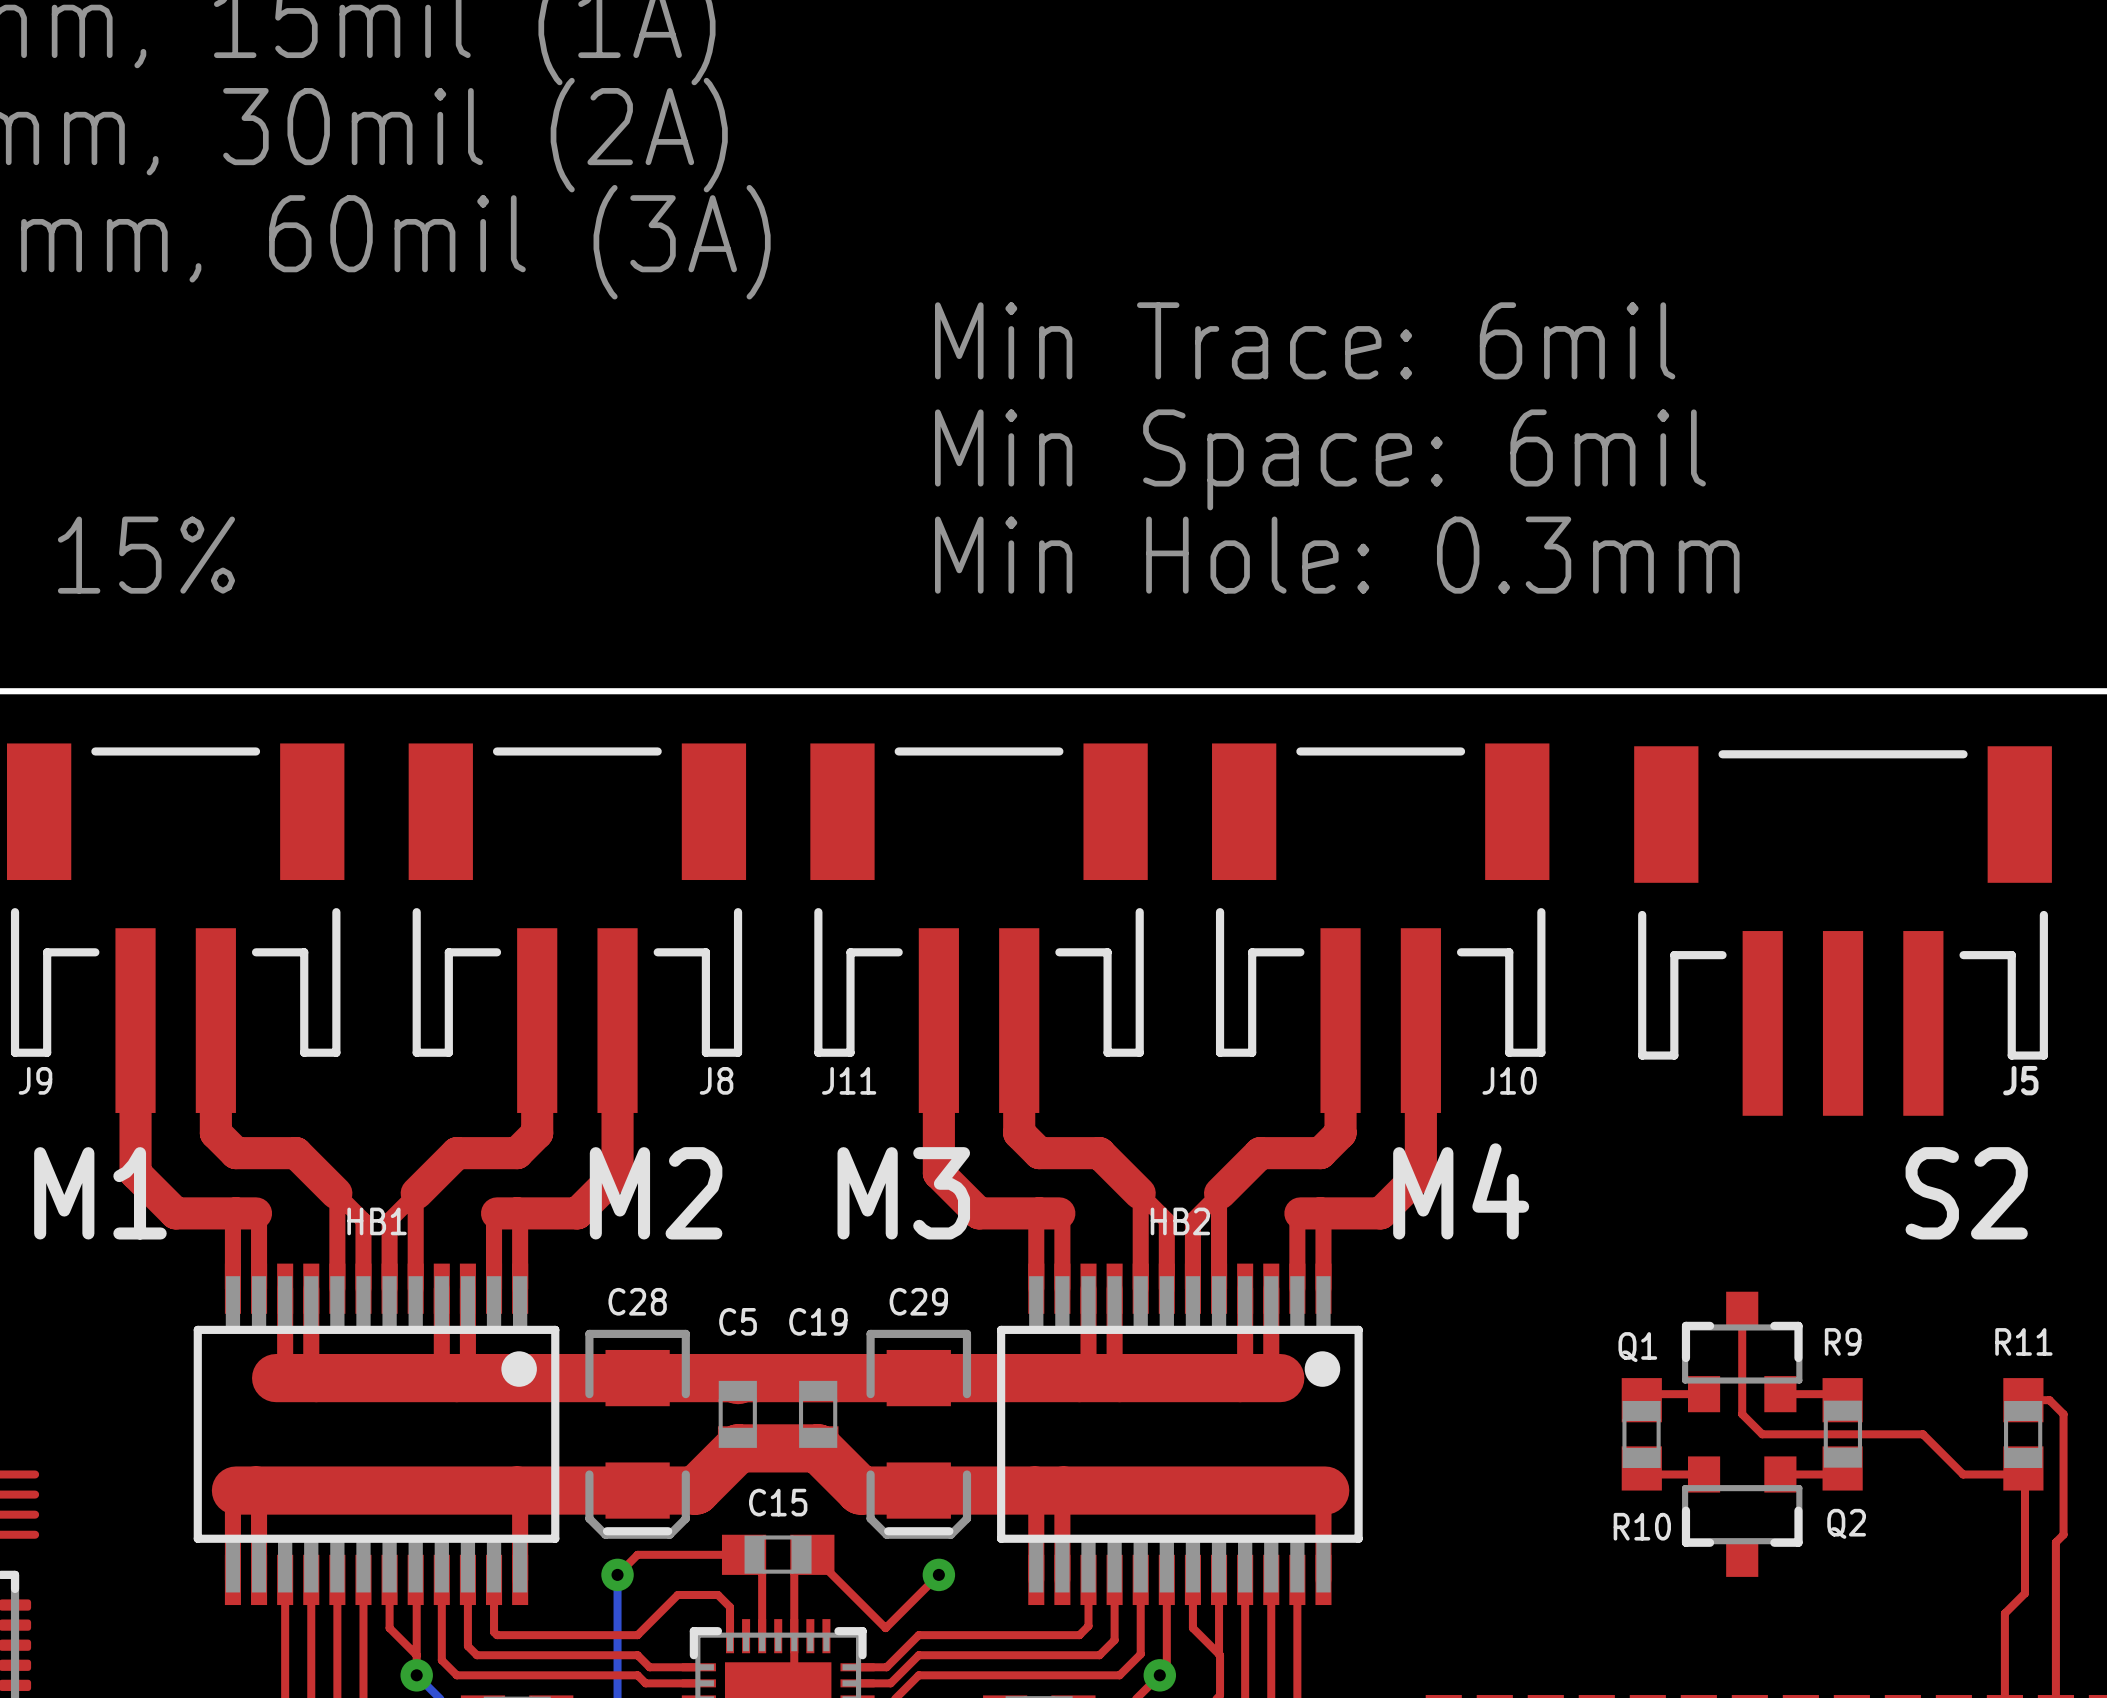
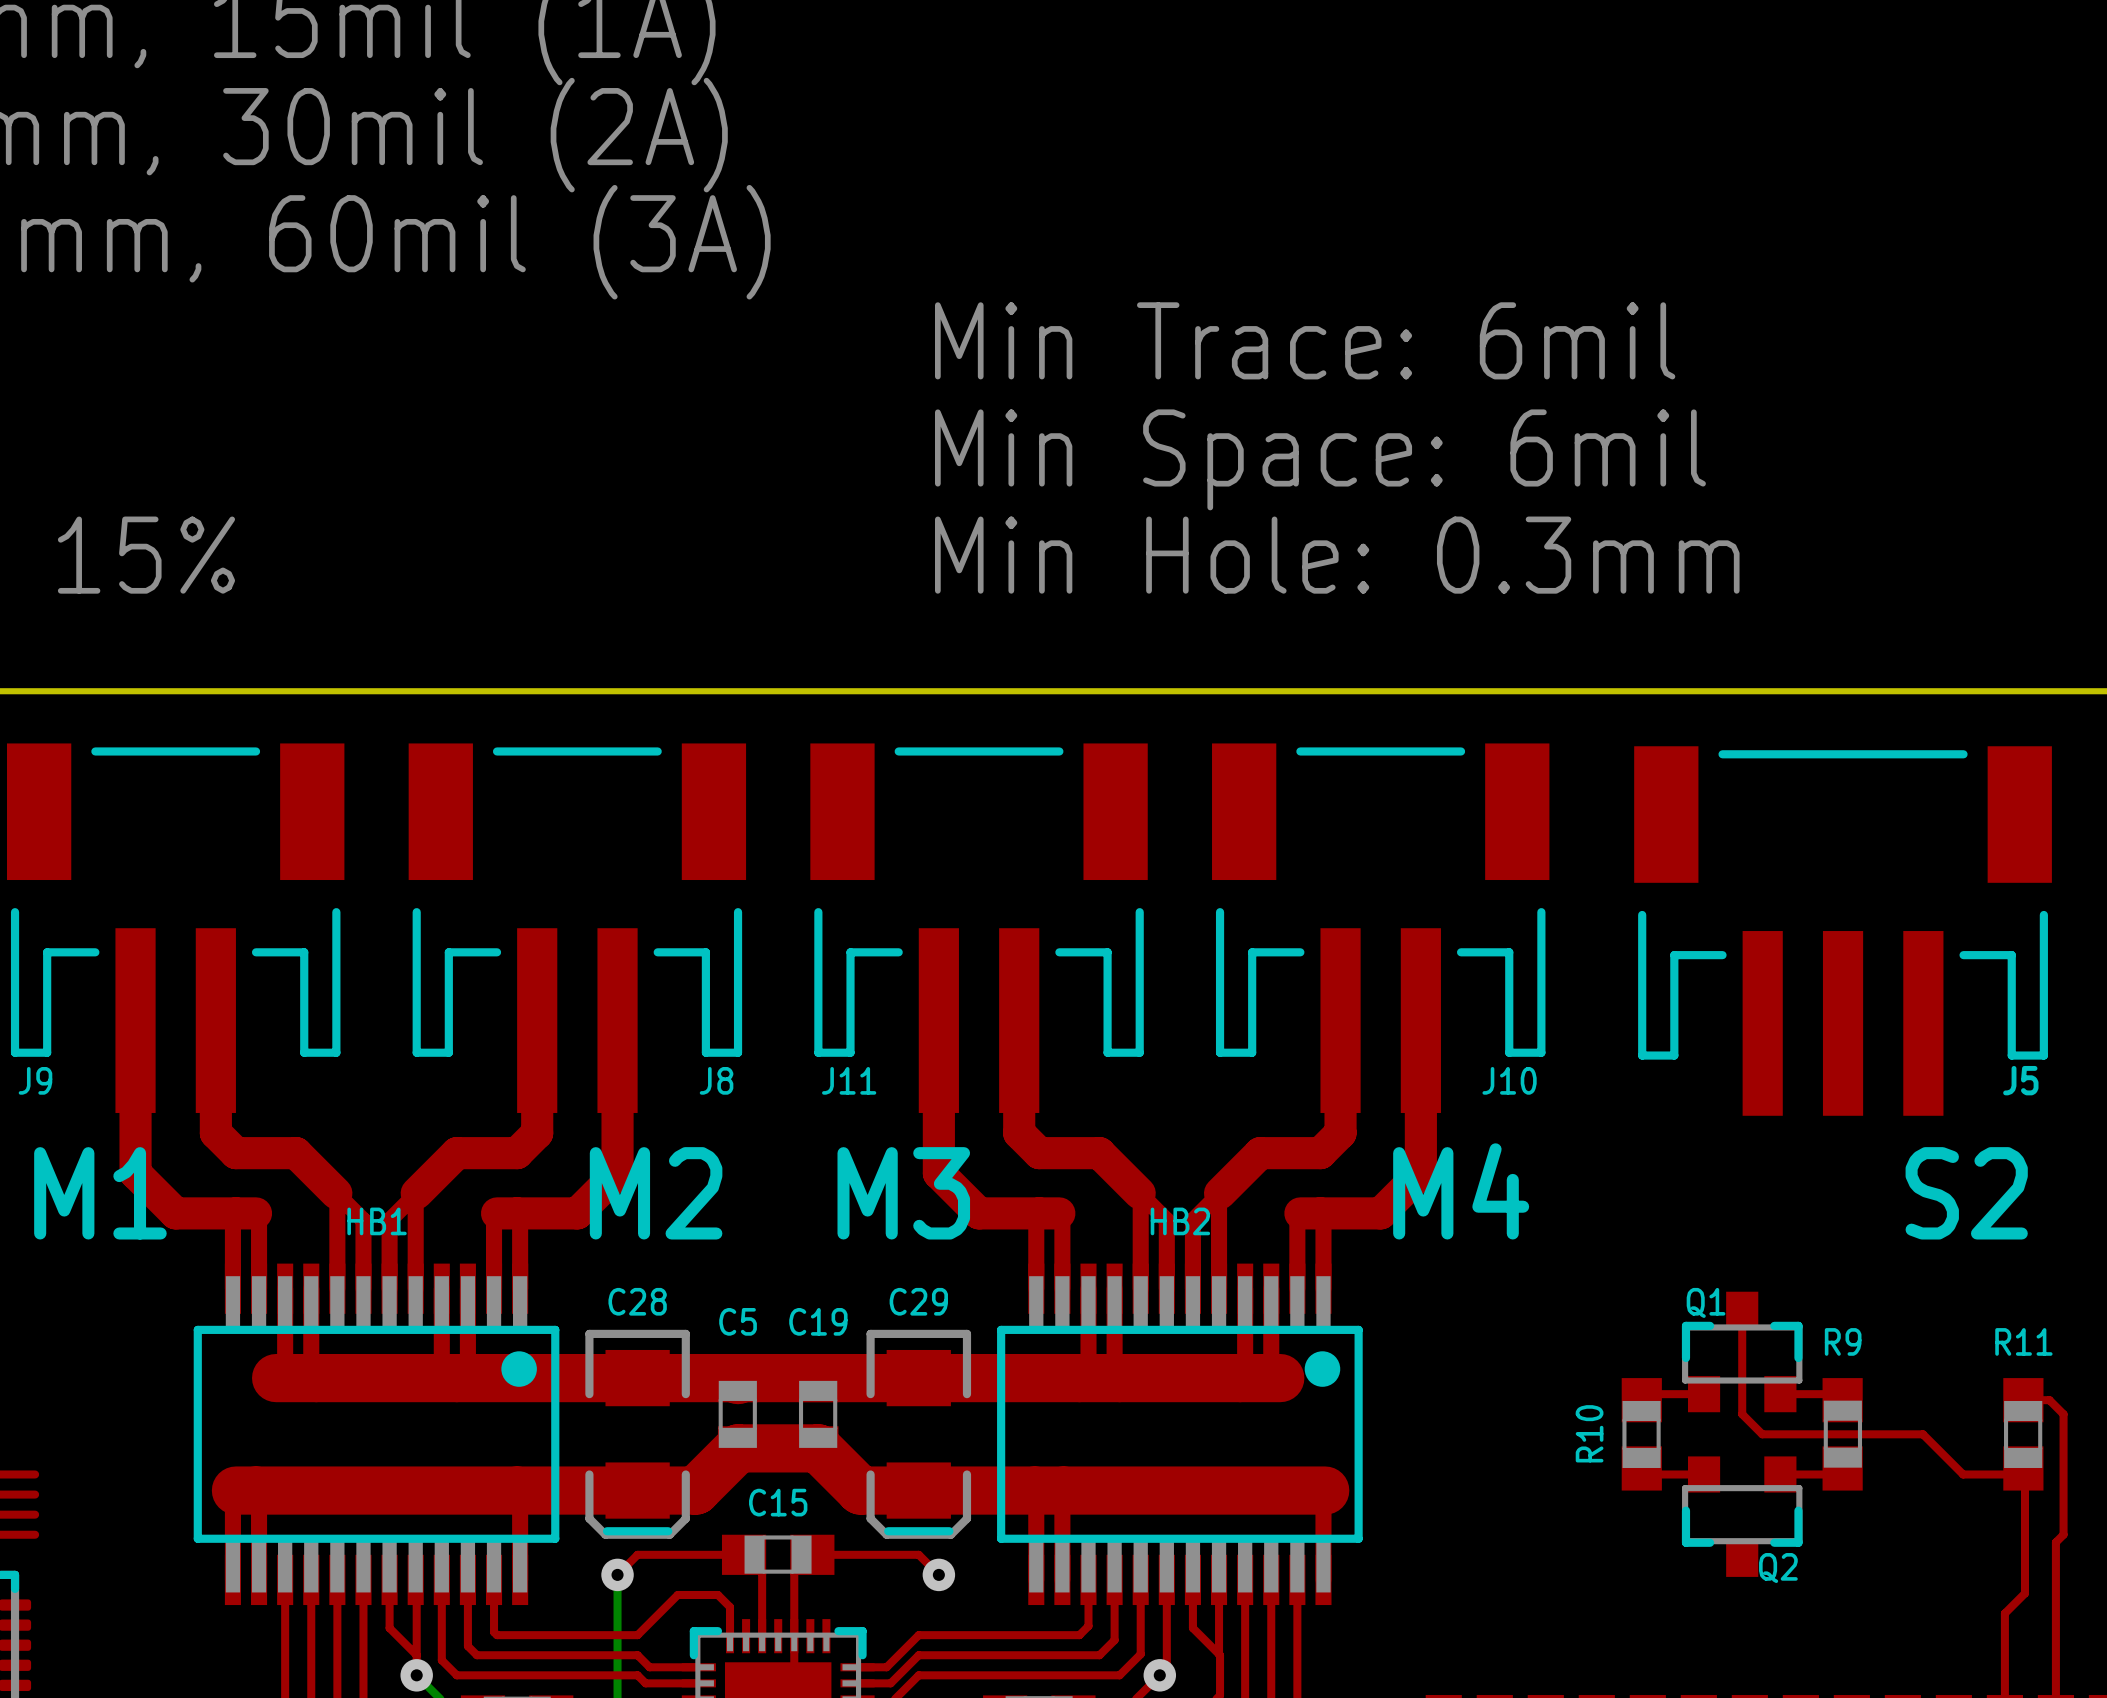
Q1 name position: Q1 (1637, 1347) -> Q1 (1706, 1302)
Q2 name position: Q2 (1846, 1523) -> Q2 (1778, 1568)
R10 name rotation: 0° (1642, 1526) -> 90° counterclockwise (1589, 1433)
R10 name position: R10 (1642, 1526) -> R10 (1589, 1433)
top track: (812, 1554) (885, 1628) (938, 1574) -> (812, 1554) (918, 1554) (938, 1574)

